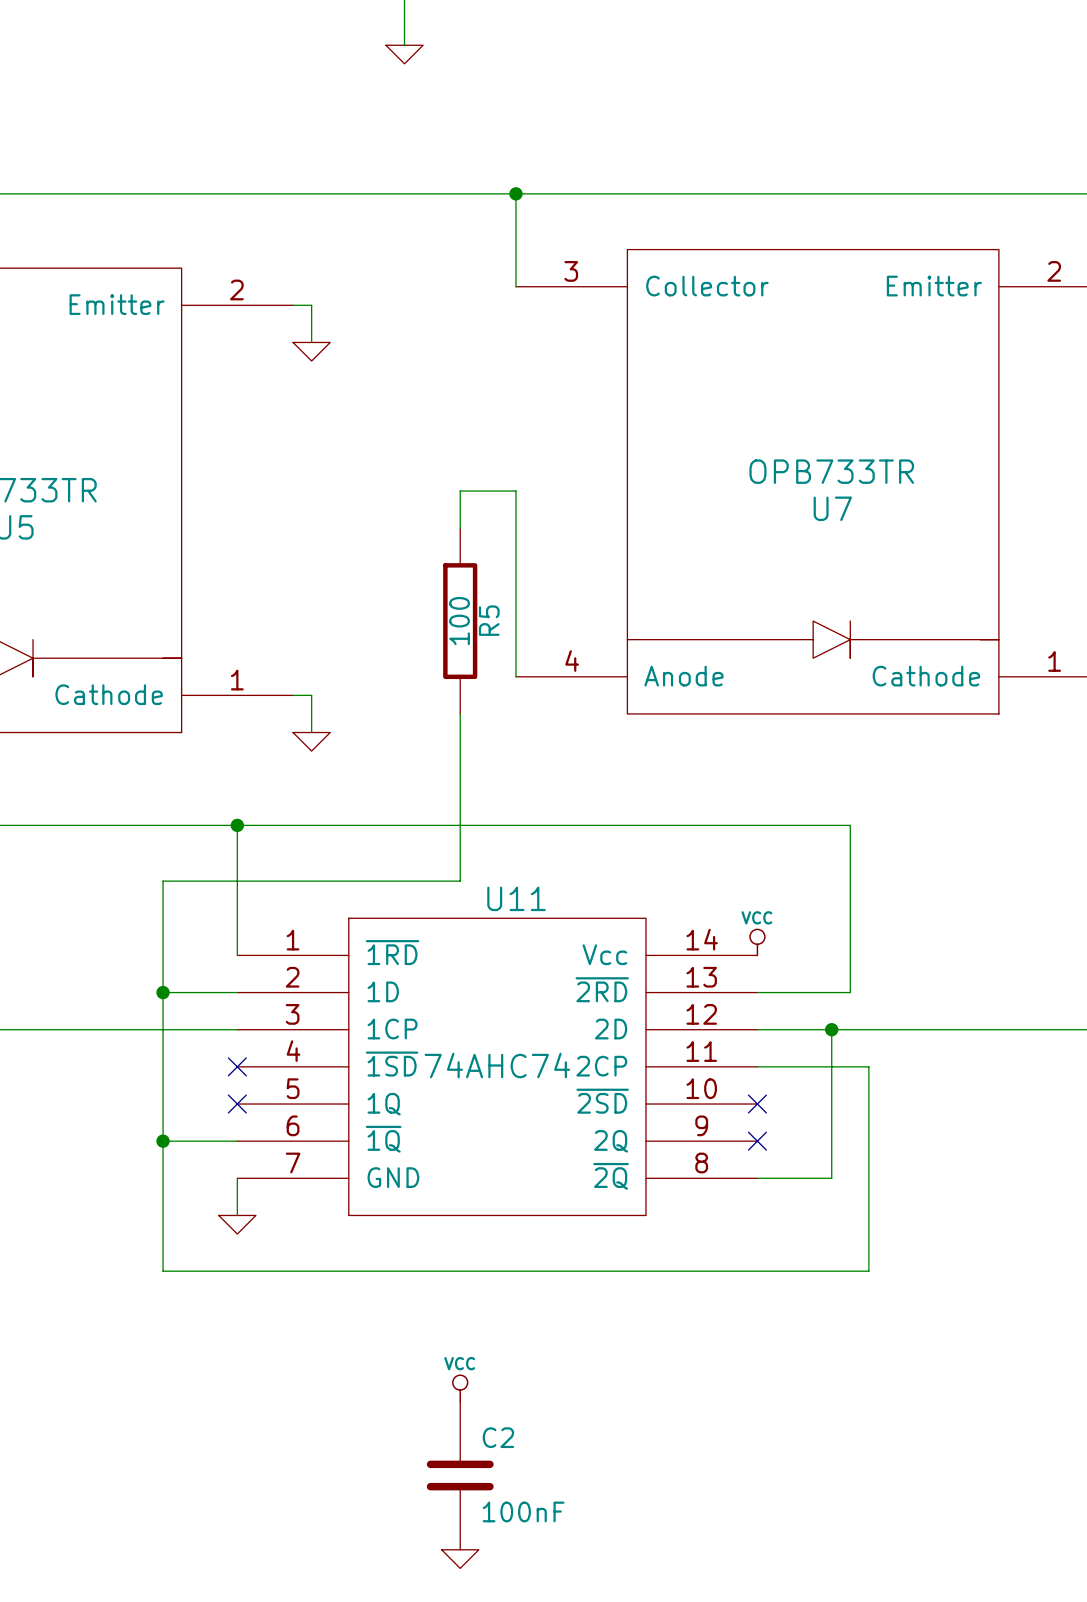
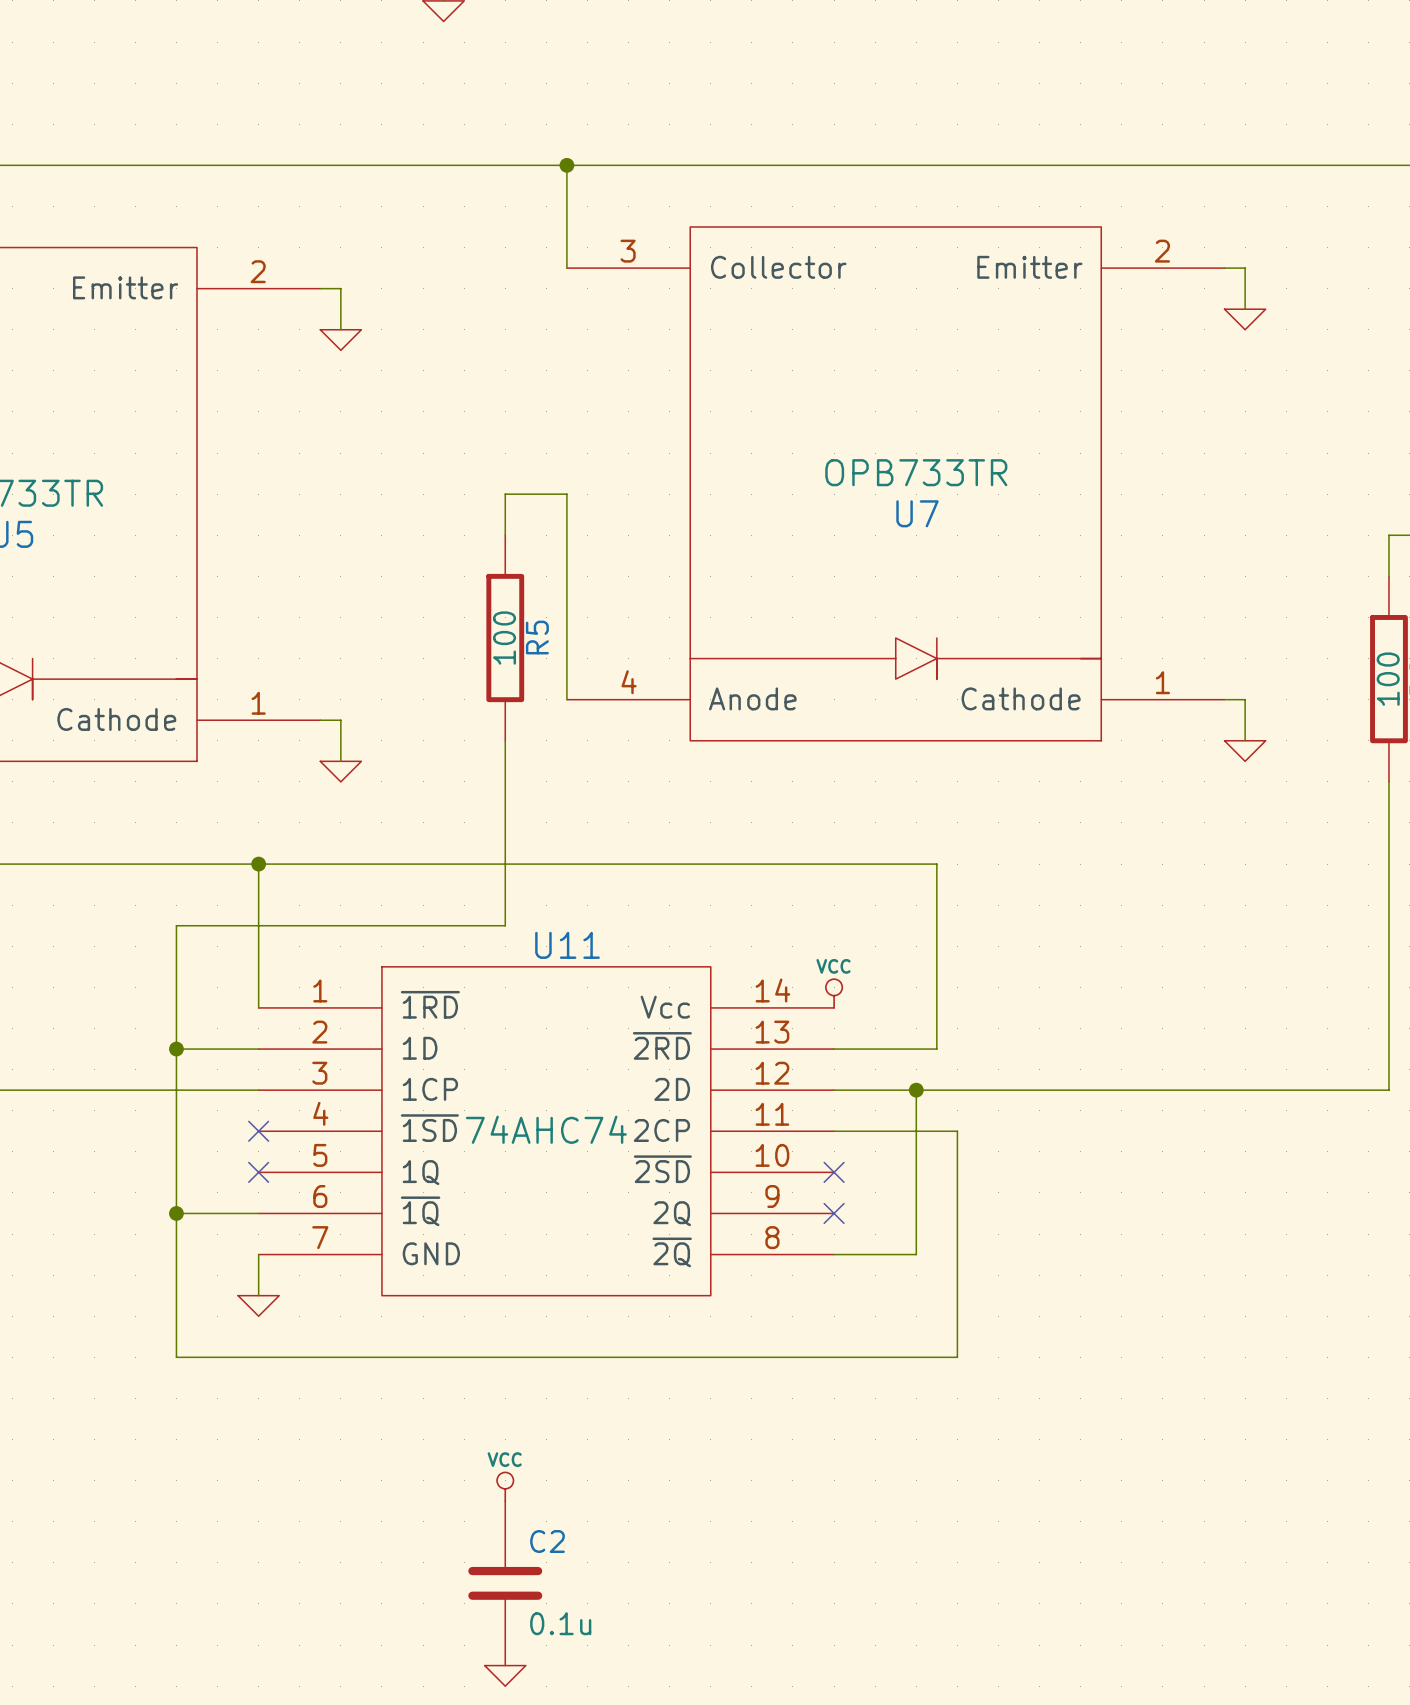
C2 value: 100nF (523, 1511) -> 0.1u (560, 1623)

